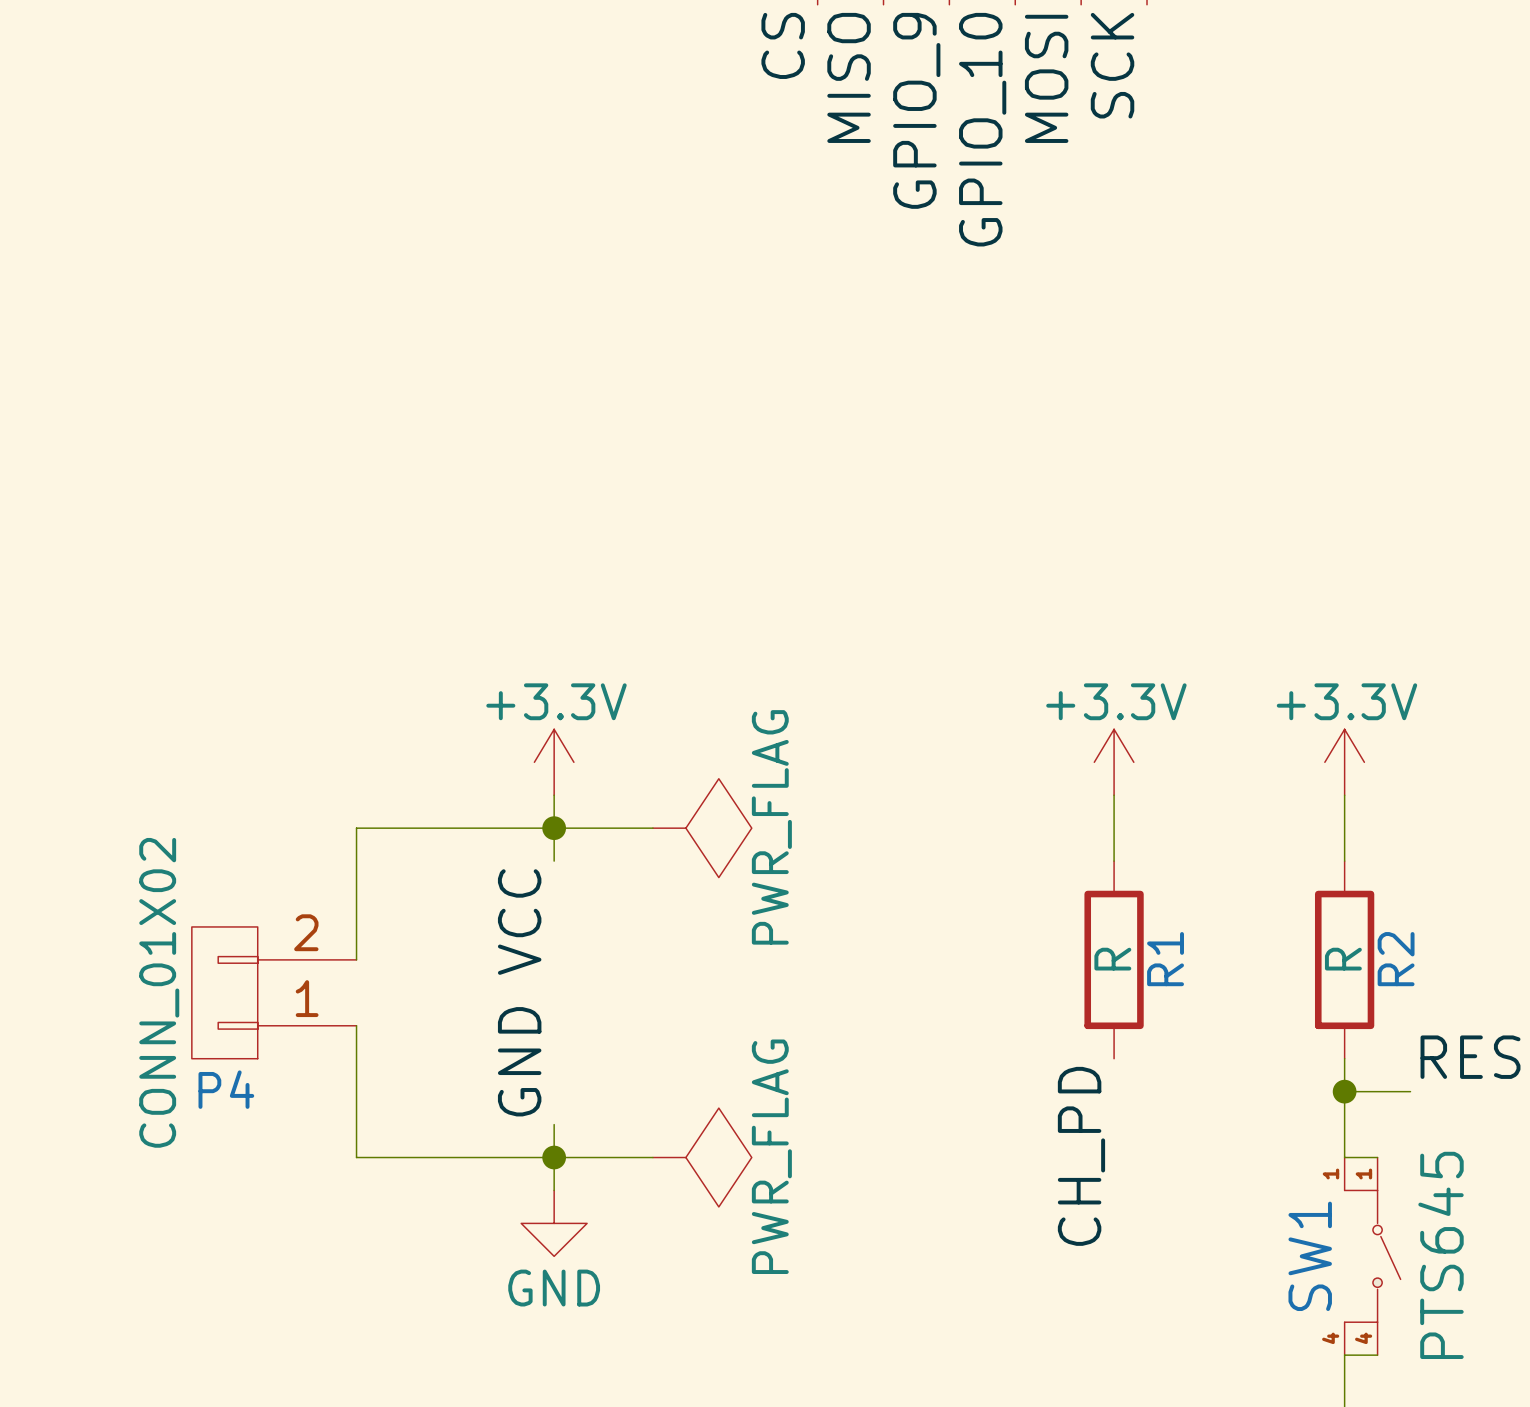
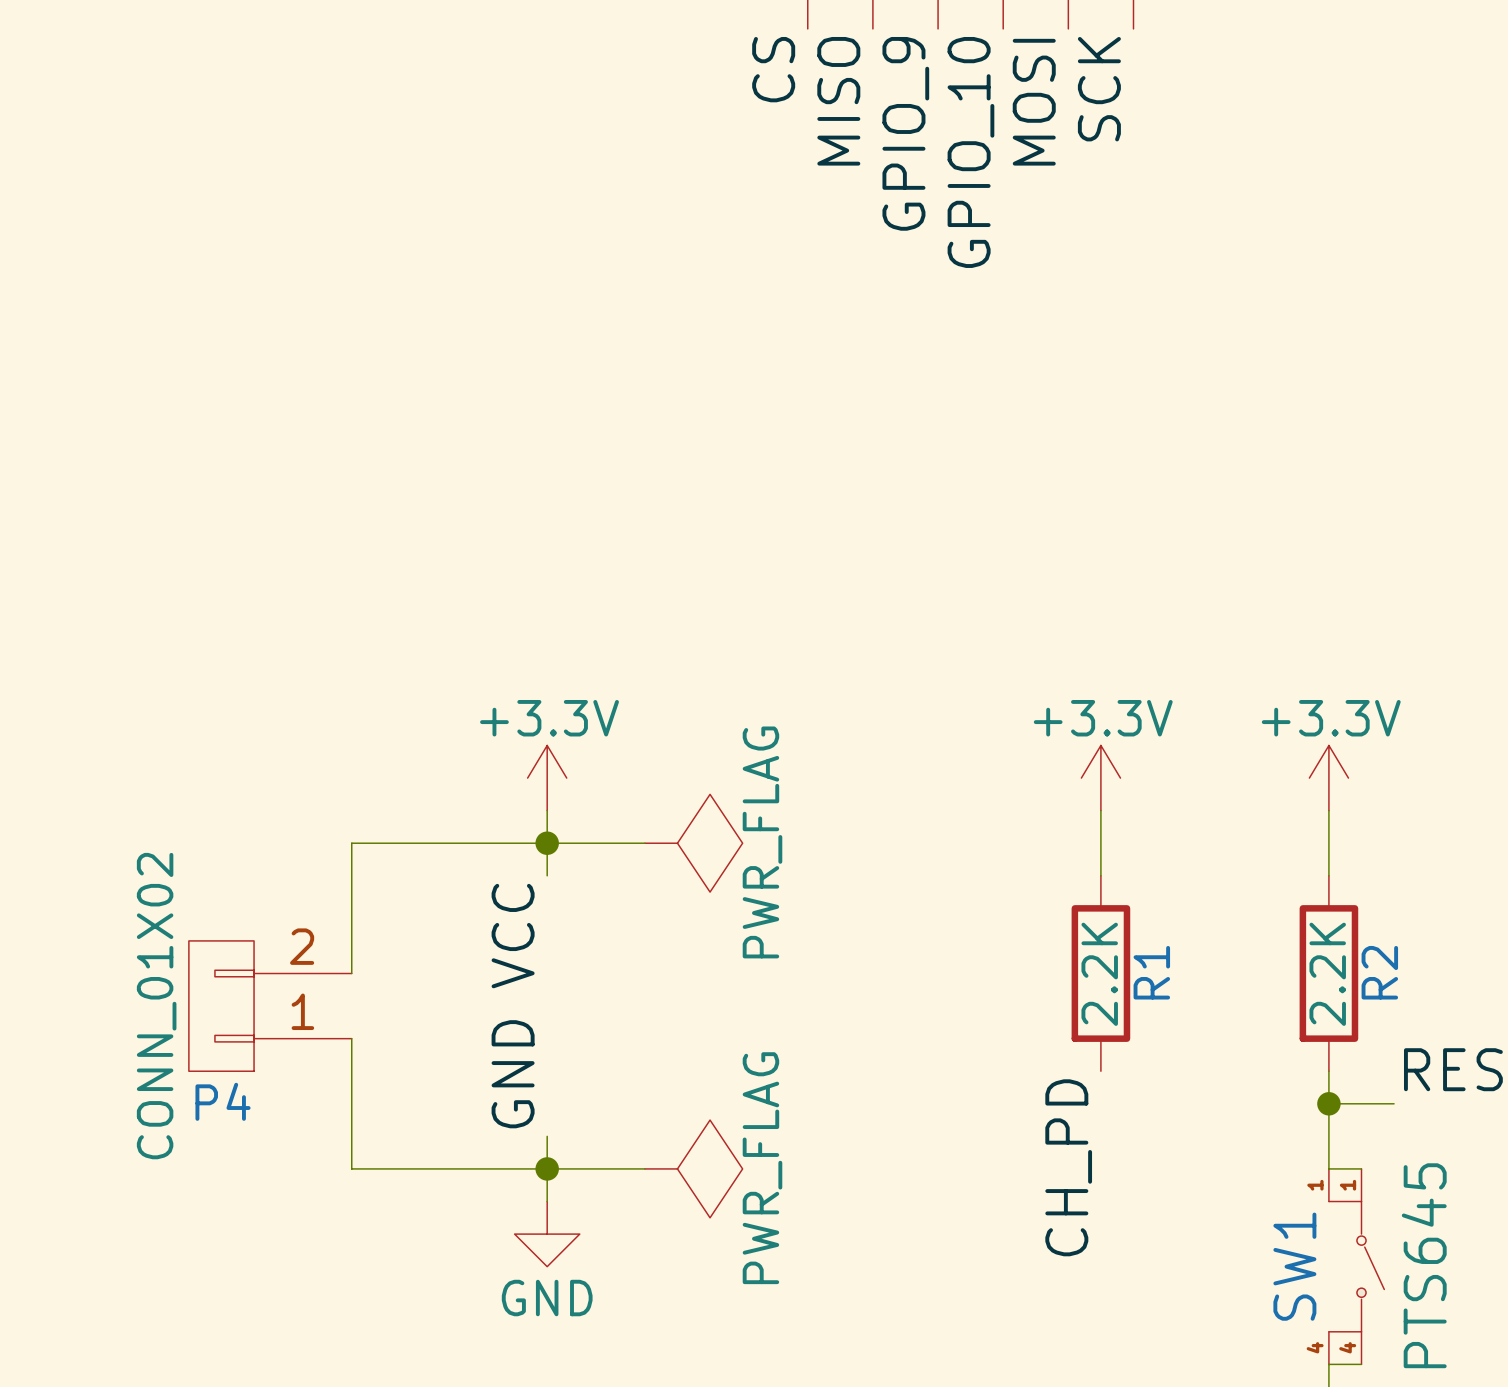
R1 value: R (1112, 959) -> 2.2K (1099, 974)
R2 value: R (1343, 959) -> 2.2K (1327, 974)

